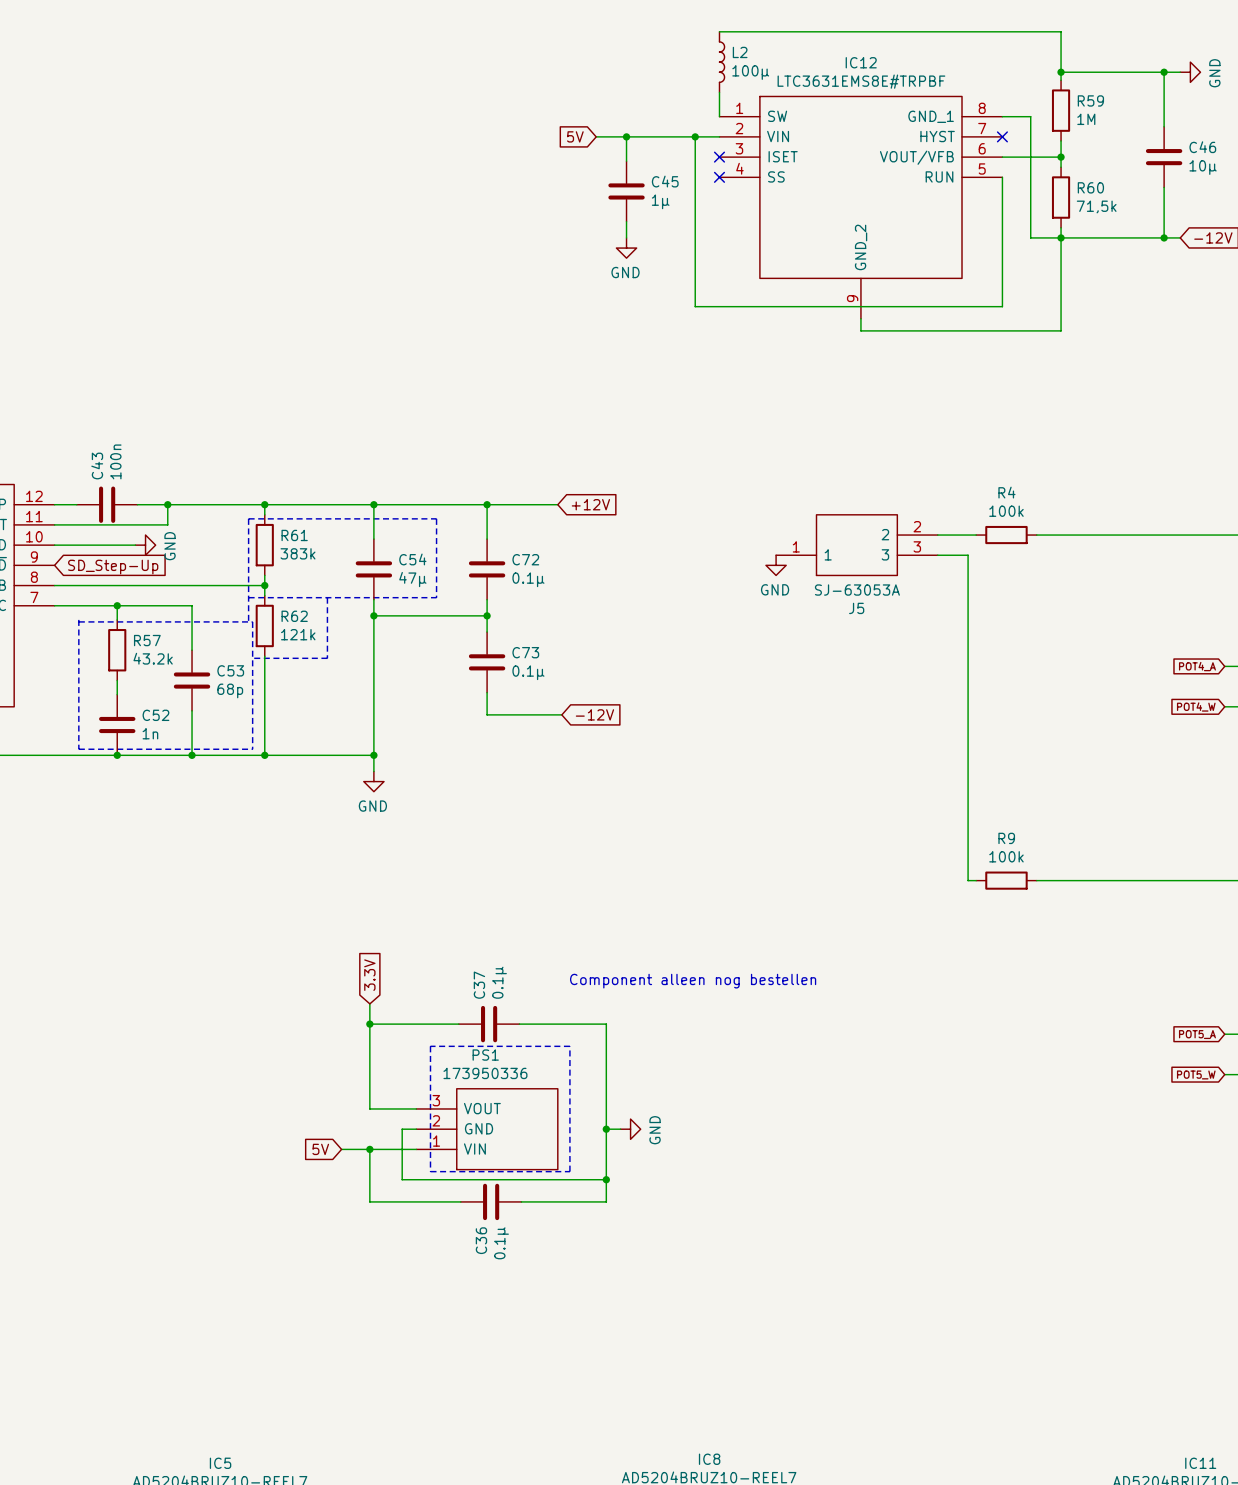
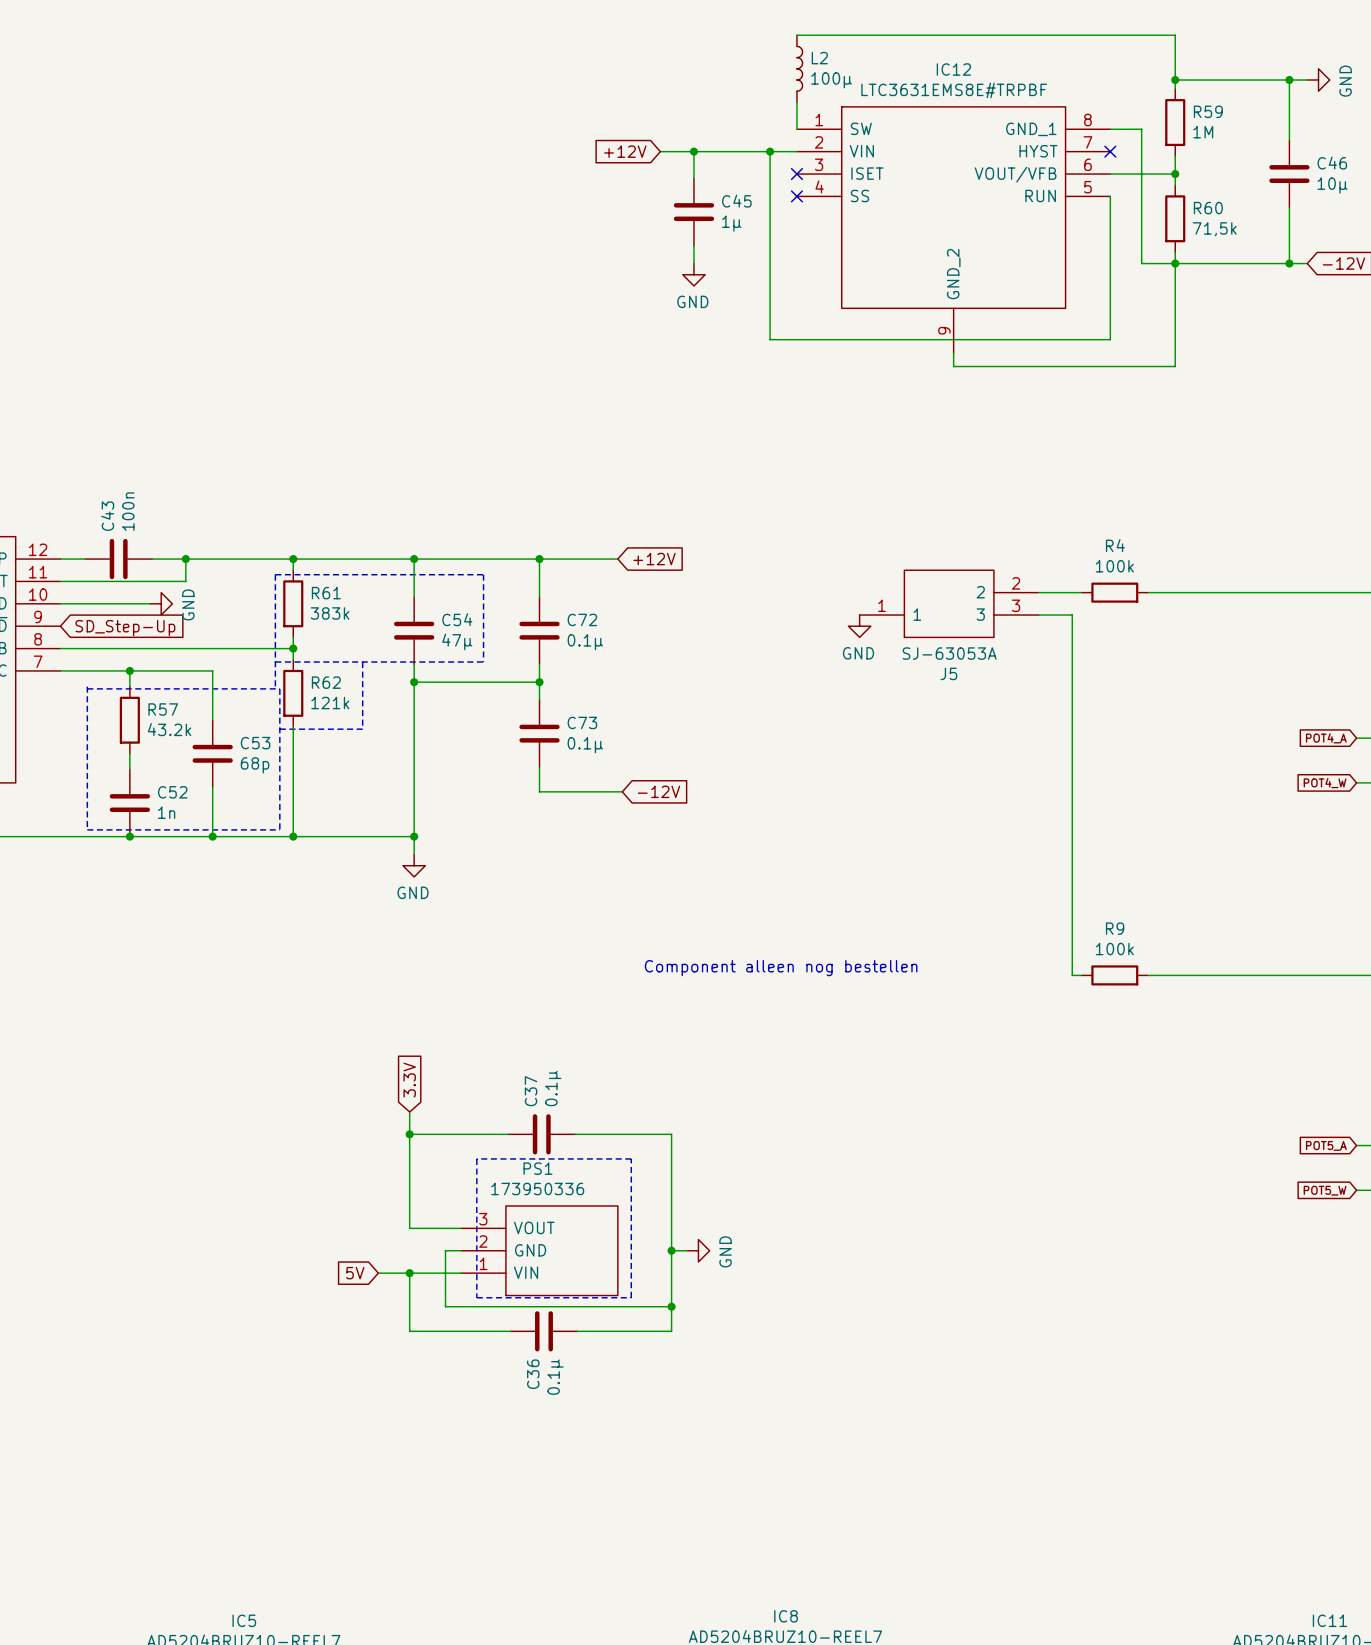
global label: 5V (575, 136) -> +12V (625, 151)
text position: Component alleen nog bestellen (693, 981) -> Component alleen nog bestellen (781, 968)

